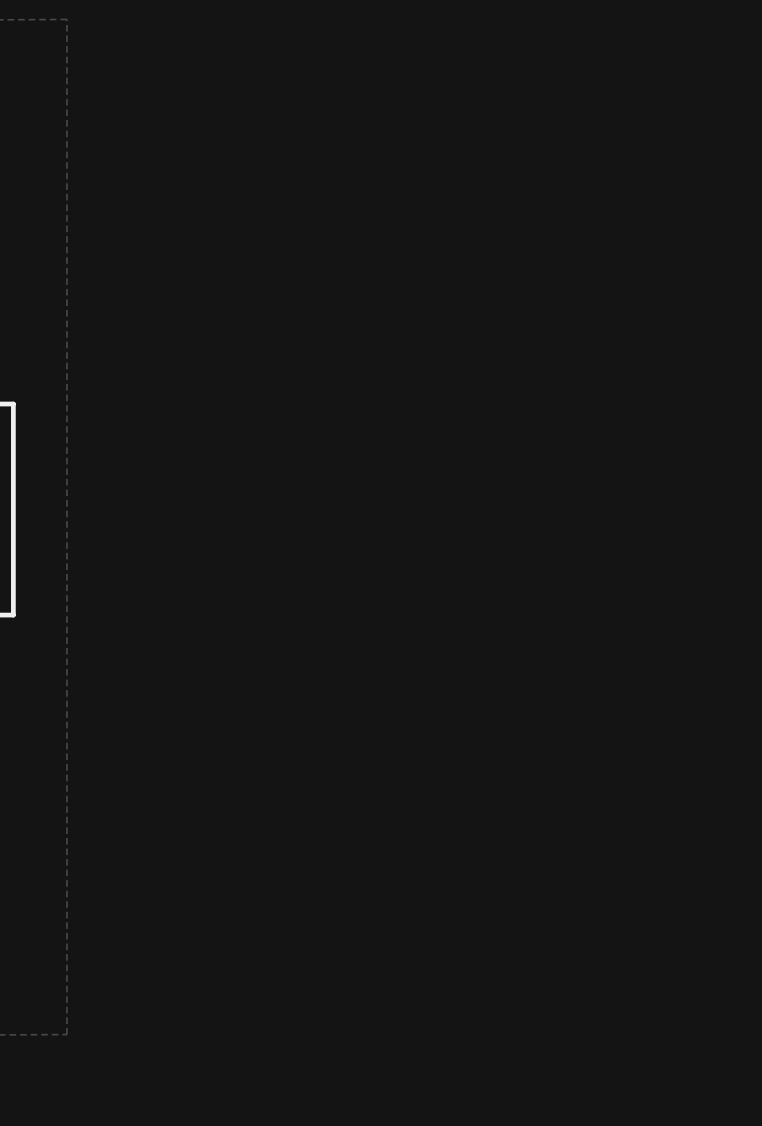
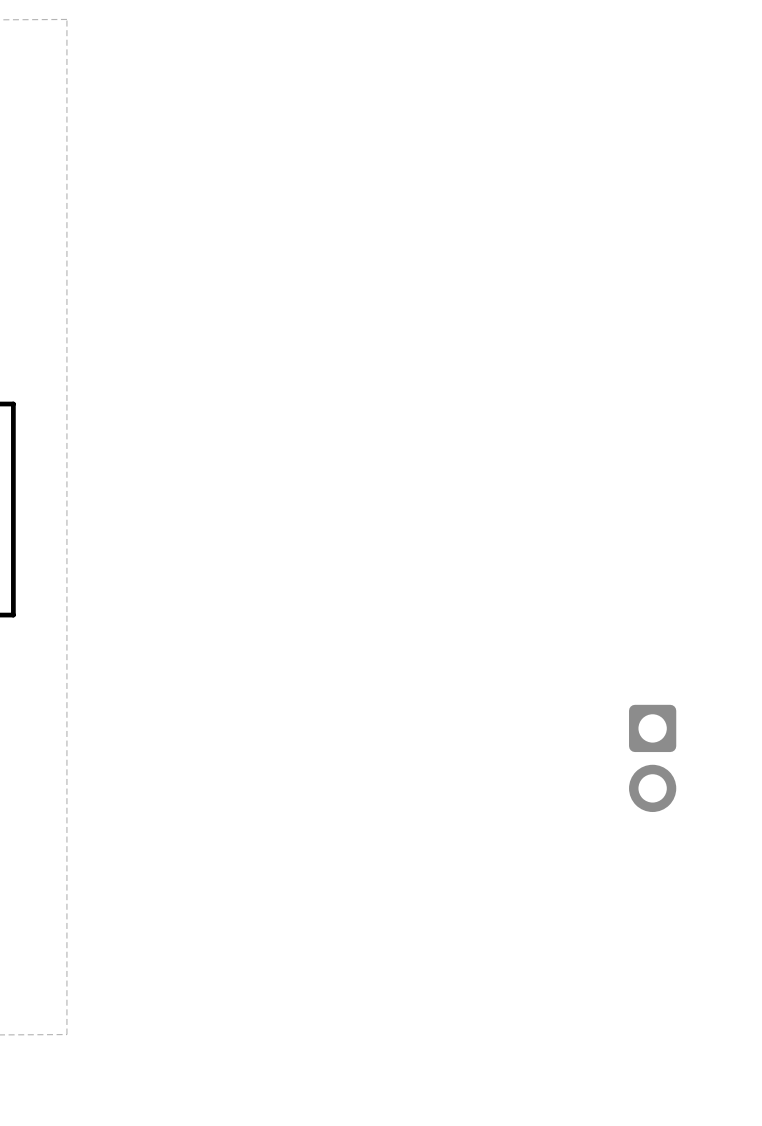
part: none -> (652, 758)

